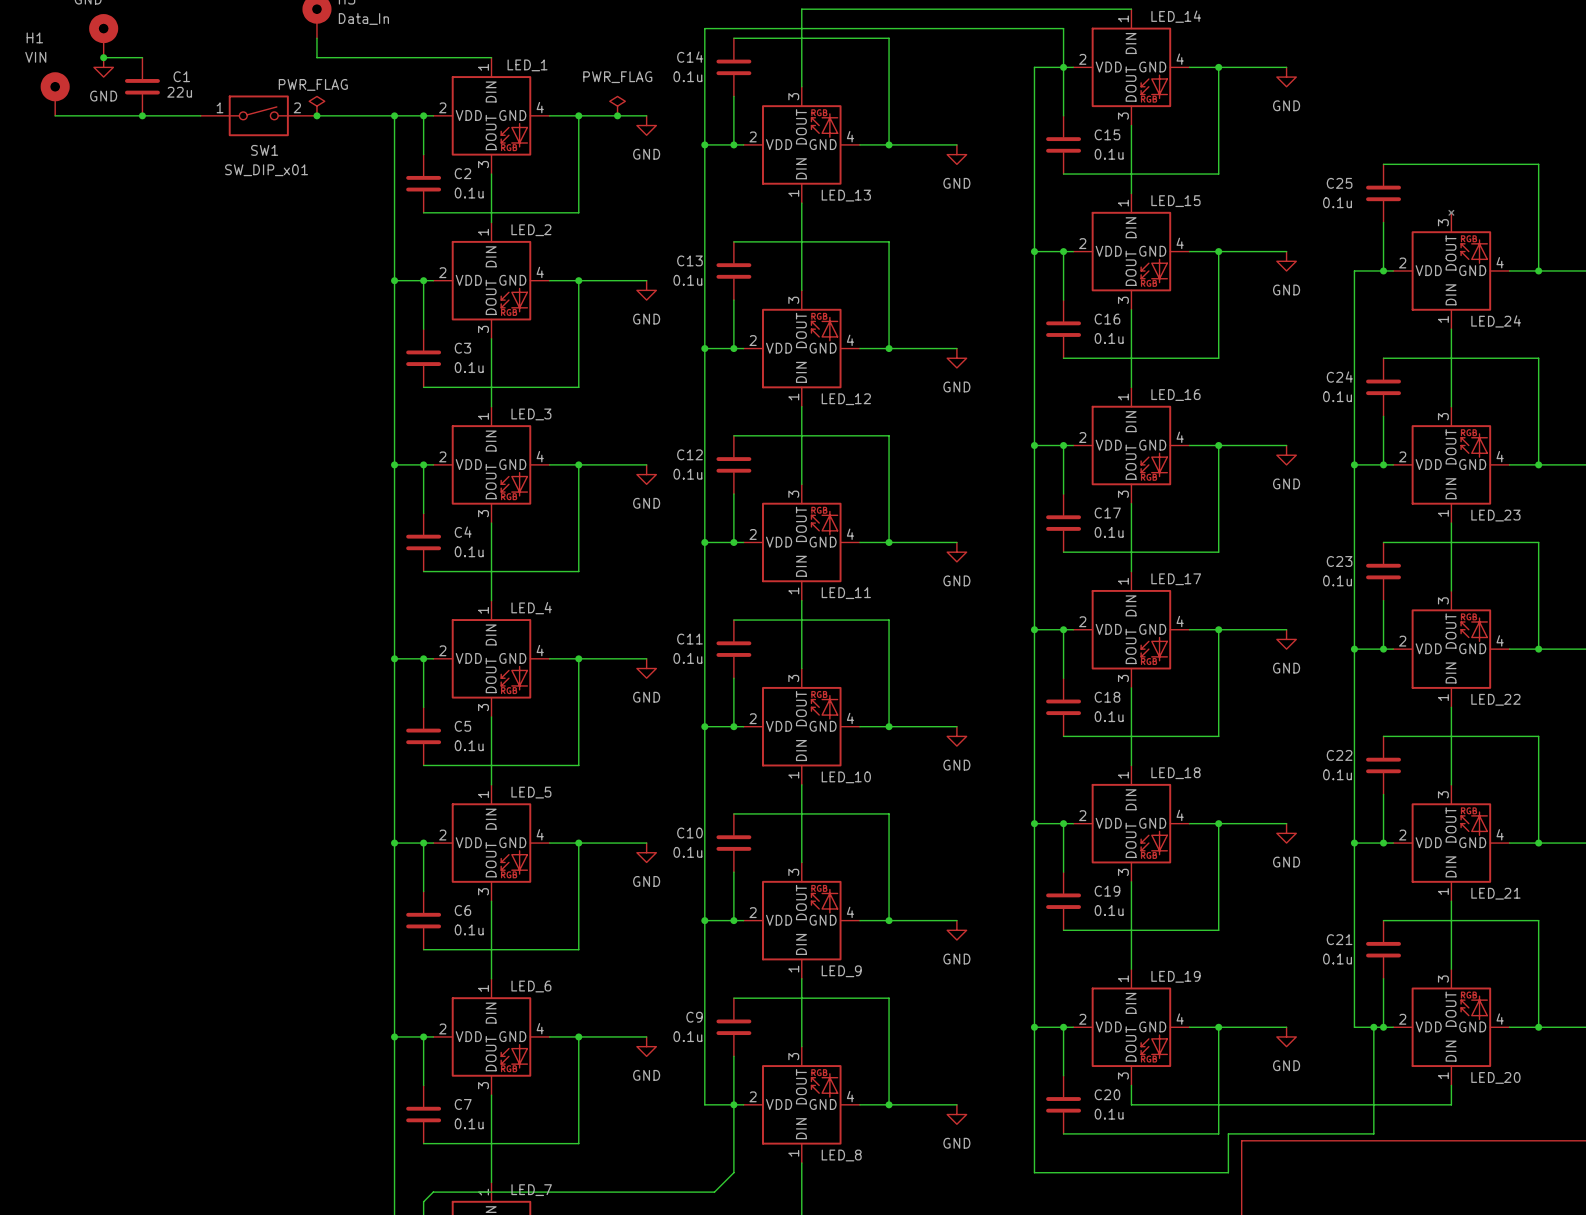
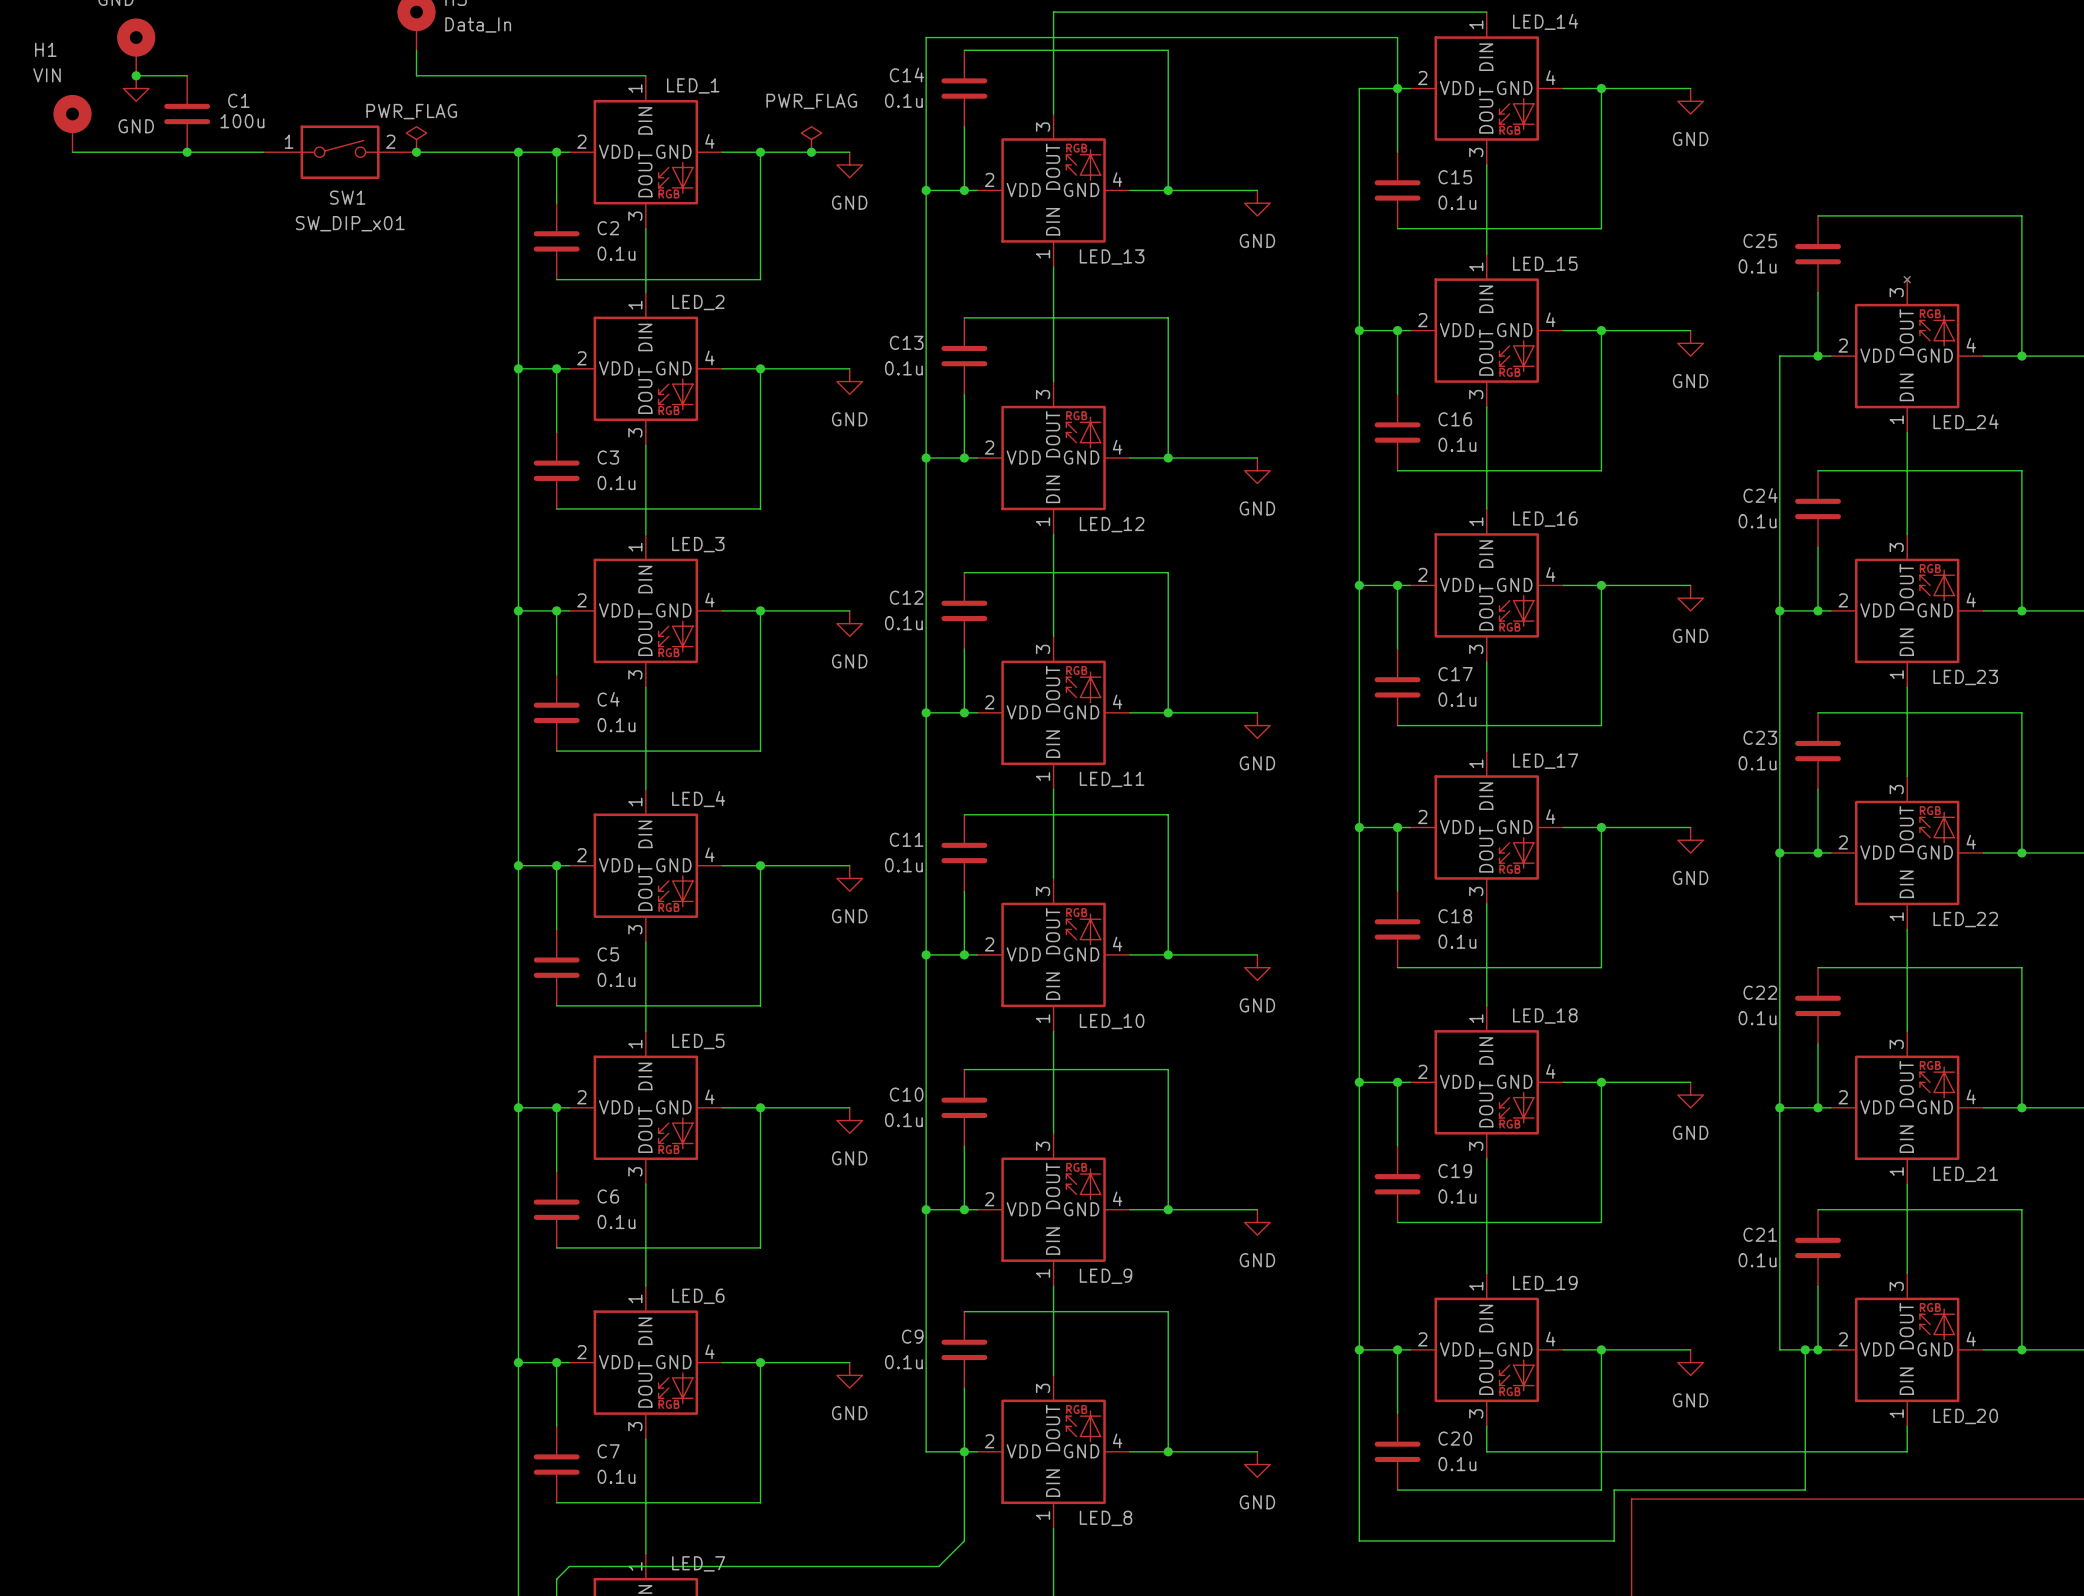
C1 value: 22u (179, 92) -> 100u (242, 121)

